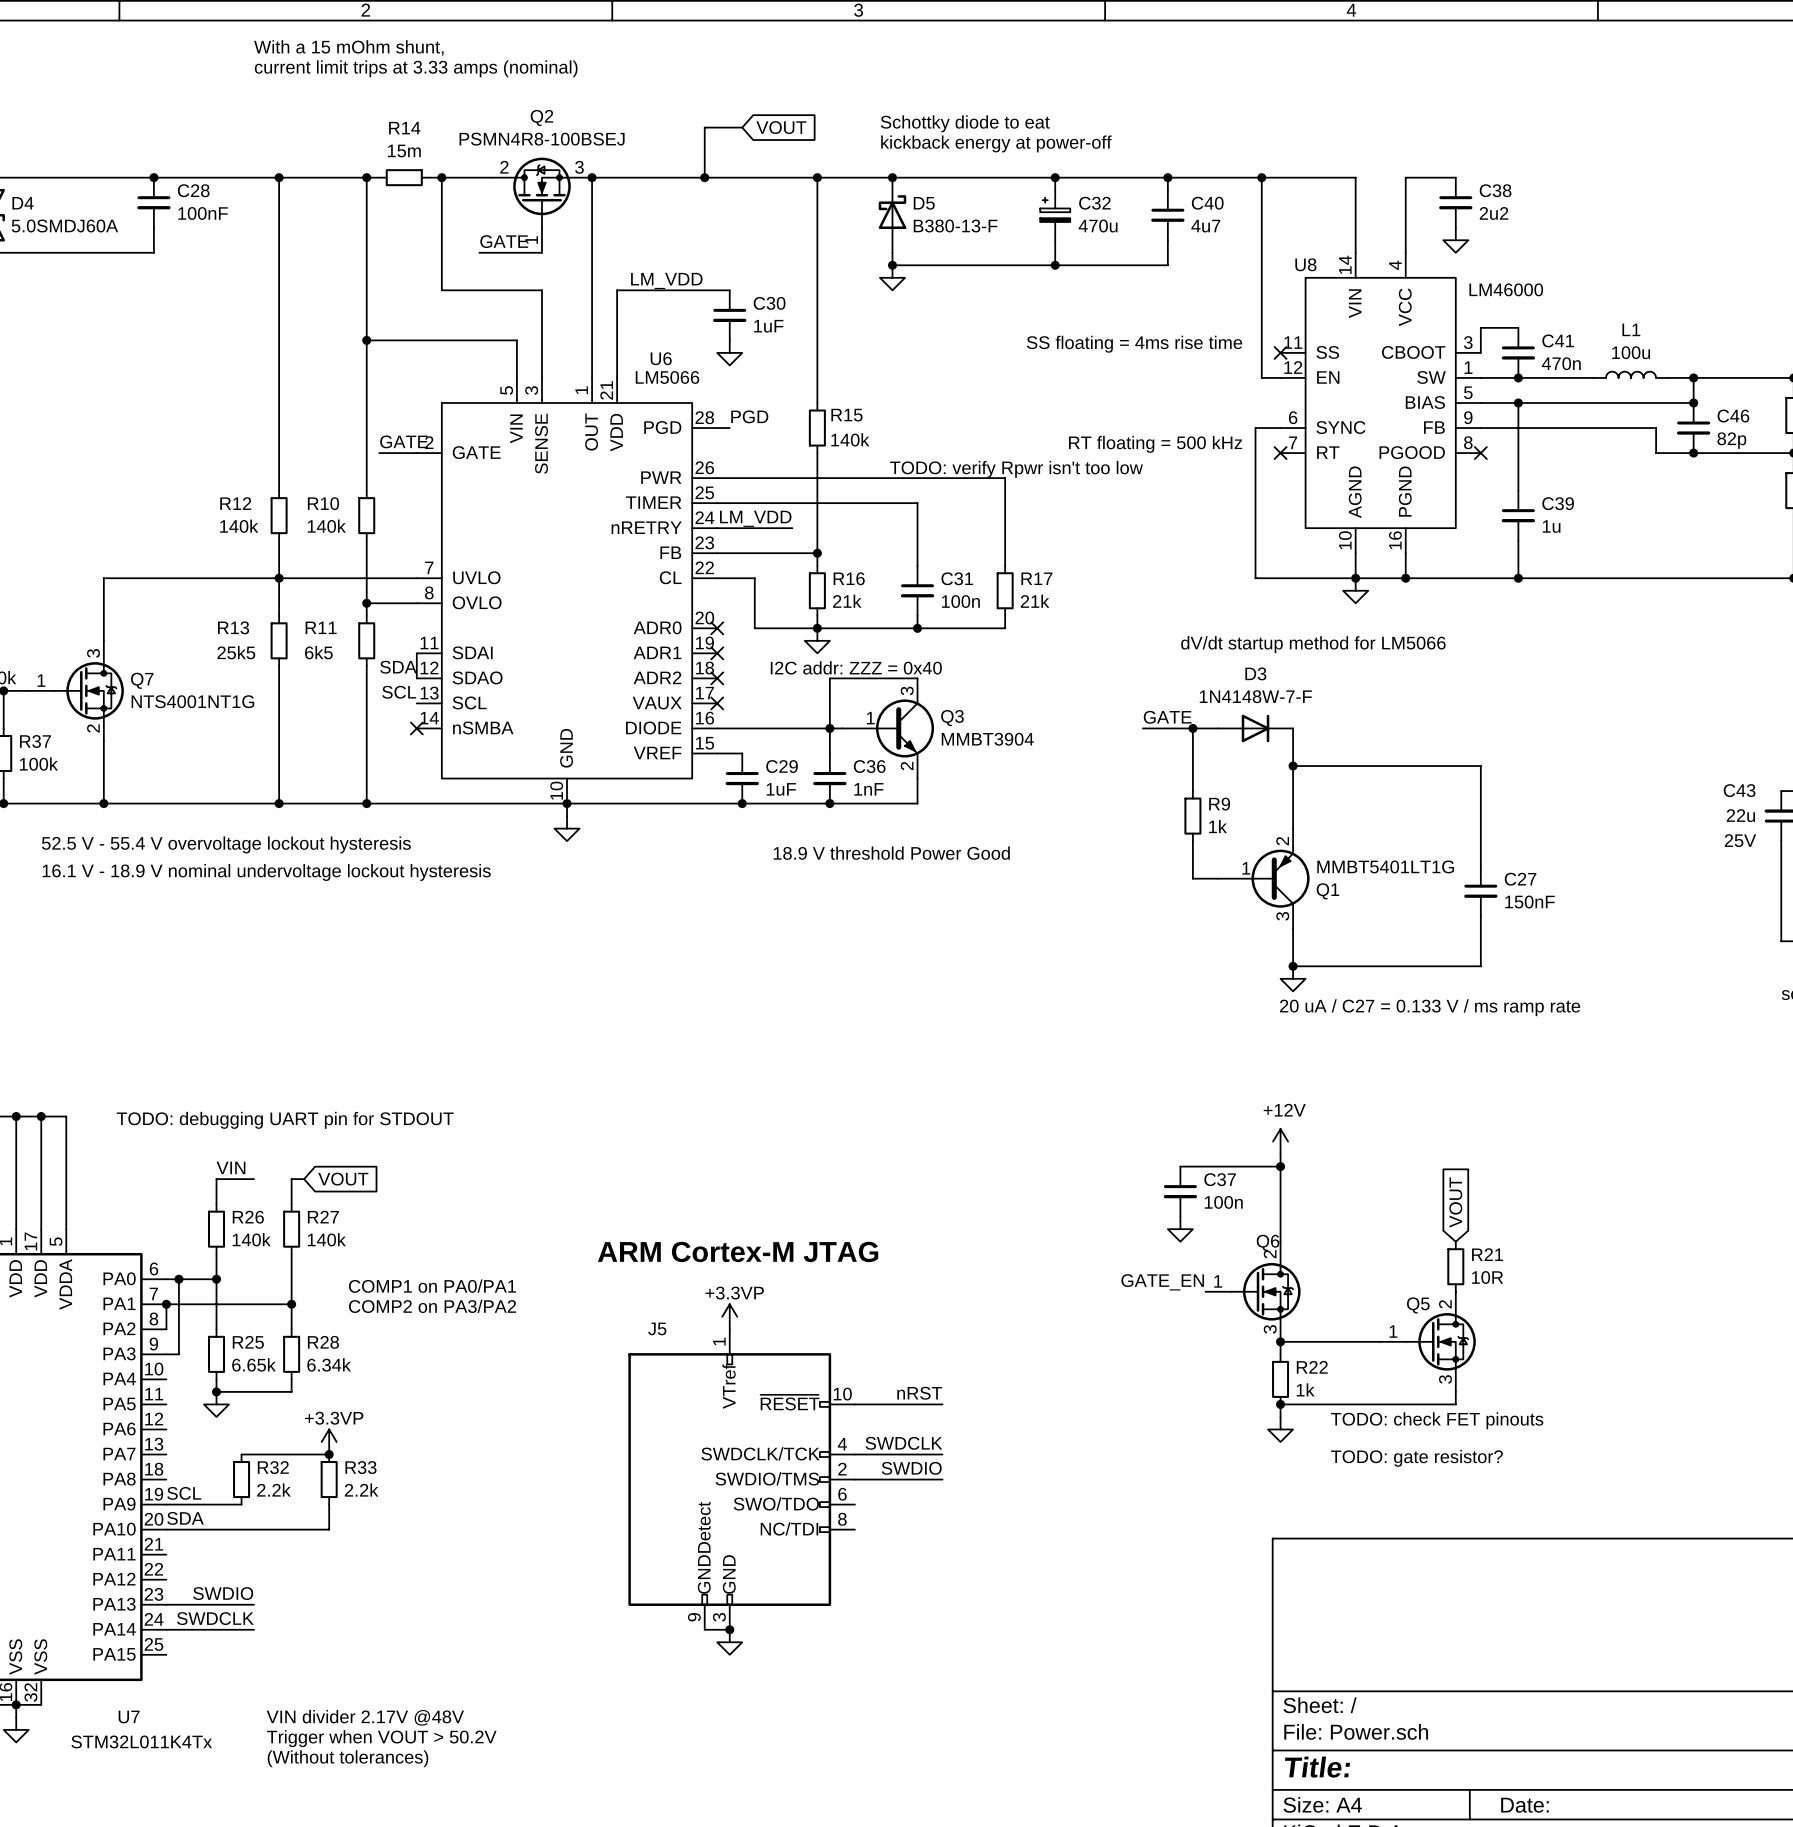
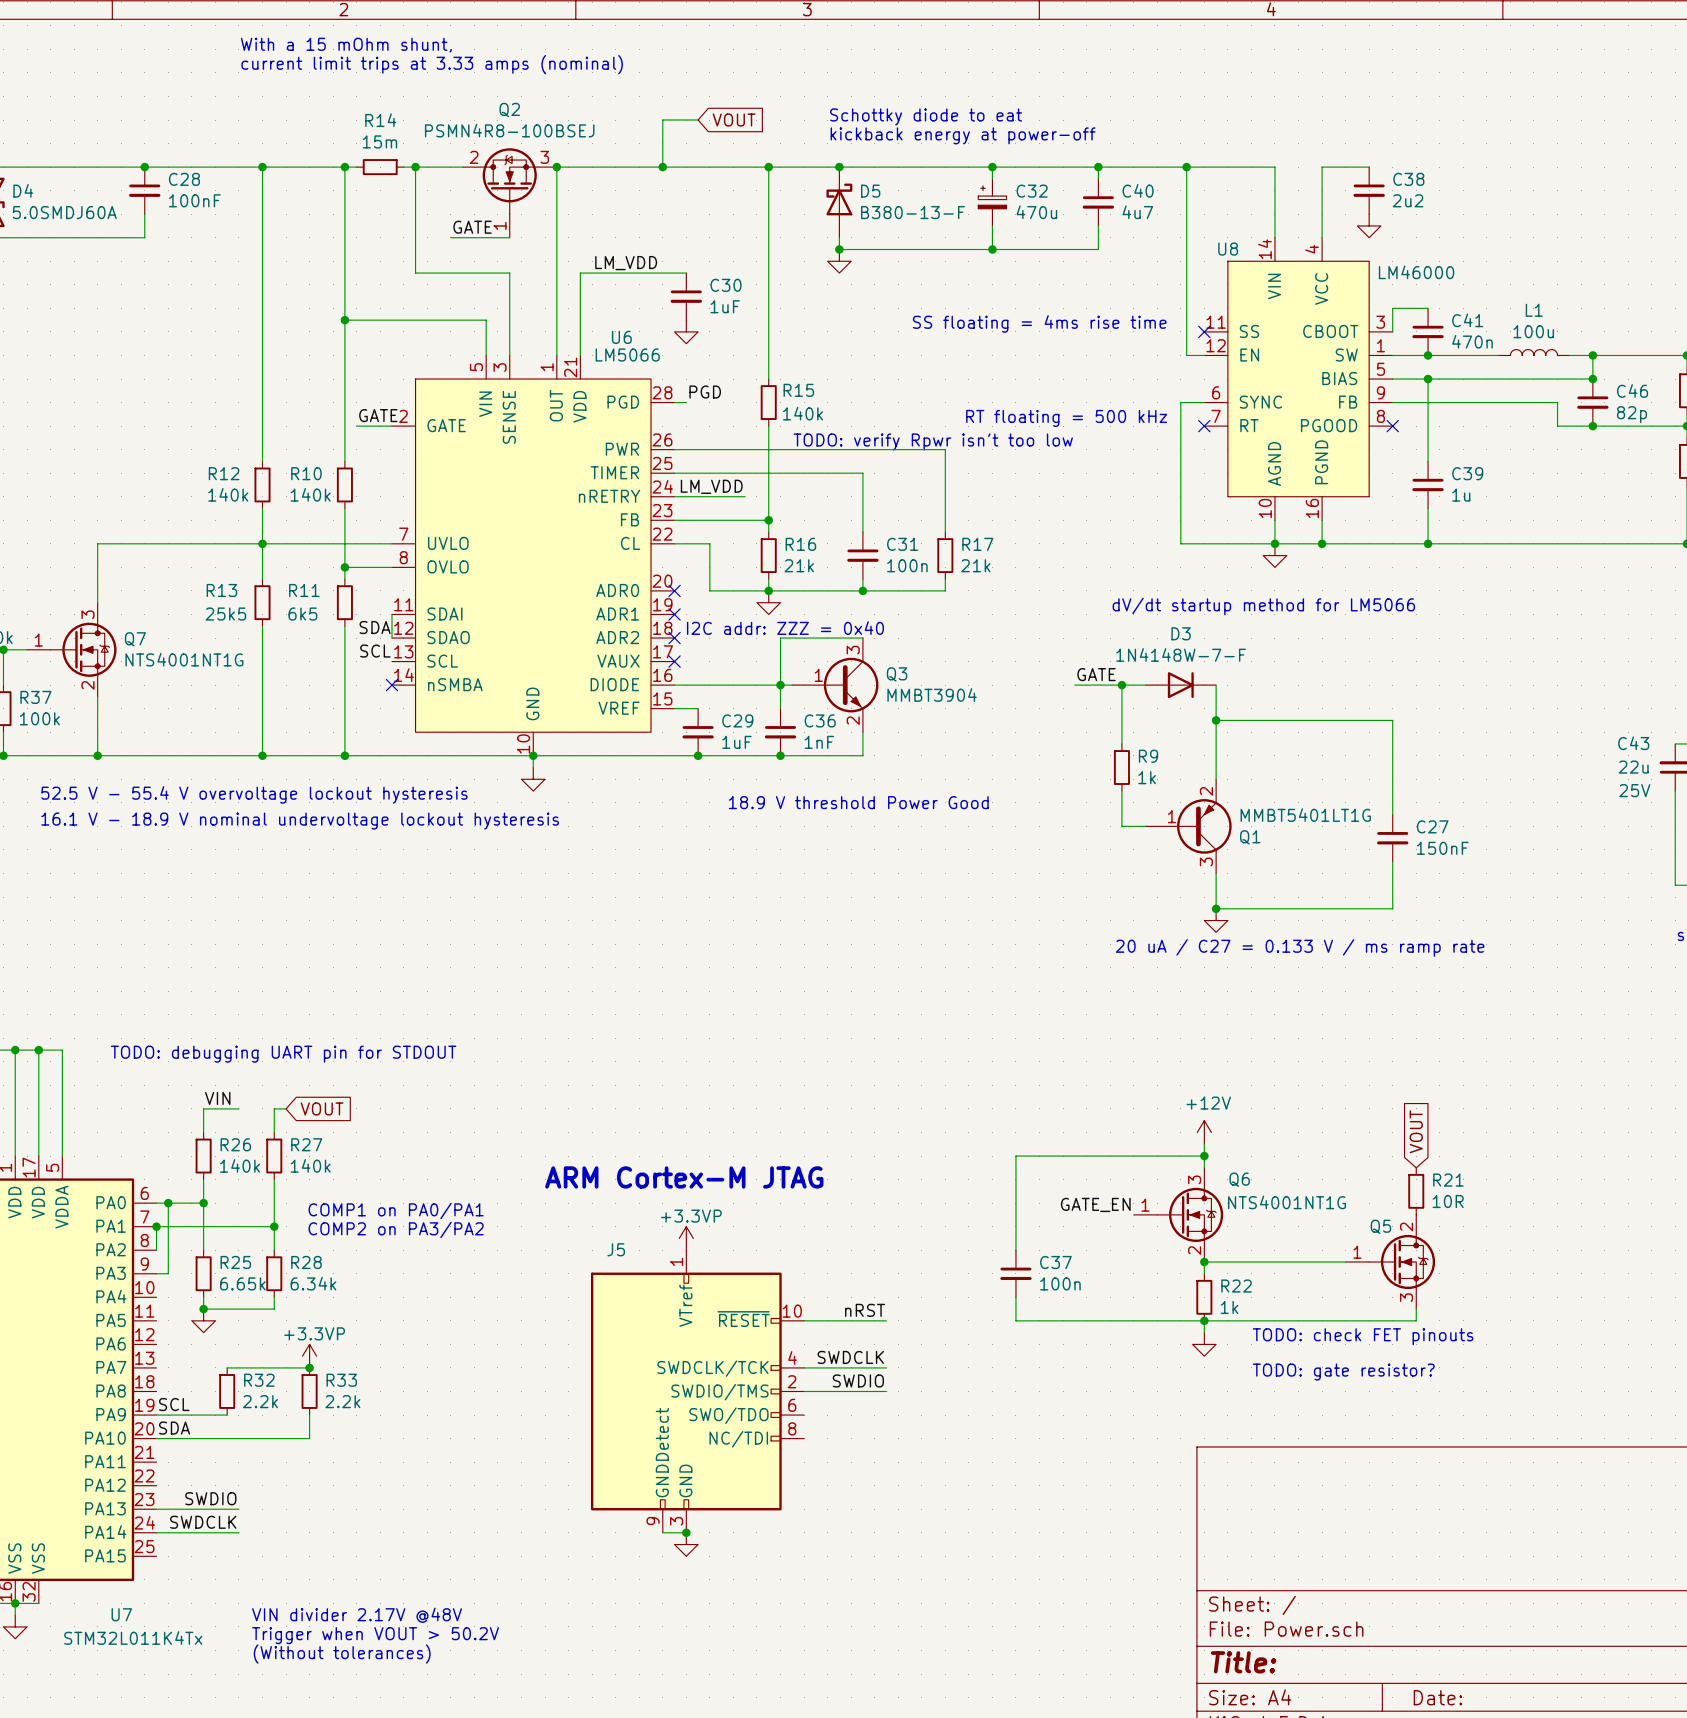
power symbol position: +12V (1280, 1141) -> +12V (1204, 1132)
wire: (1280, 1154) (1280, 1216) -> none
wire: (1180, 1166) (1280, 1166) -> none
junction: (1280, 1166) -> none
C37 position: (1180, 1191) -> (1015, 1273)
global label position: VOUT (1455, 1202) -> VOUT (1416, 1131)
power symbol: (1180, 1229) -> none
wire: none -> (1204, 1156) (1015, 1156) (1015, 1250)
junction: none -> (1204, 1156)
Q6 name position: Q6 (1268, 1242) -> Q6 (1239, 1179)
Q6 pin number: 2 (1270, 1254) -> 3 (1194, 1179)
R21 position: (1455, 1266) -> (1416, 1191)
Q6 value: none -> NTS4001NT1G (1287, 1202)
Q6 pin number: 3 (1270, 1329) -> 2 (1194, 1250)
Q5 position: (1428, 1341) -> (1390, 1261)
wire: none -> (1015, 1297) (1015, 1320) (1204, 1320)
wire: (1455, 1391) (1455, 1404) -> (1416, 1309) (1416, 1320) (1369, 1320)

